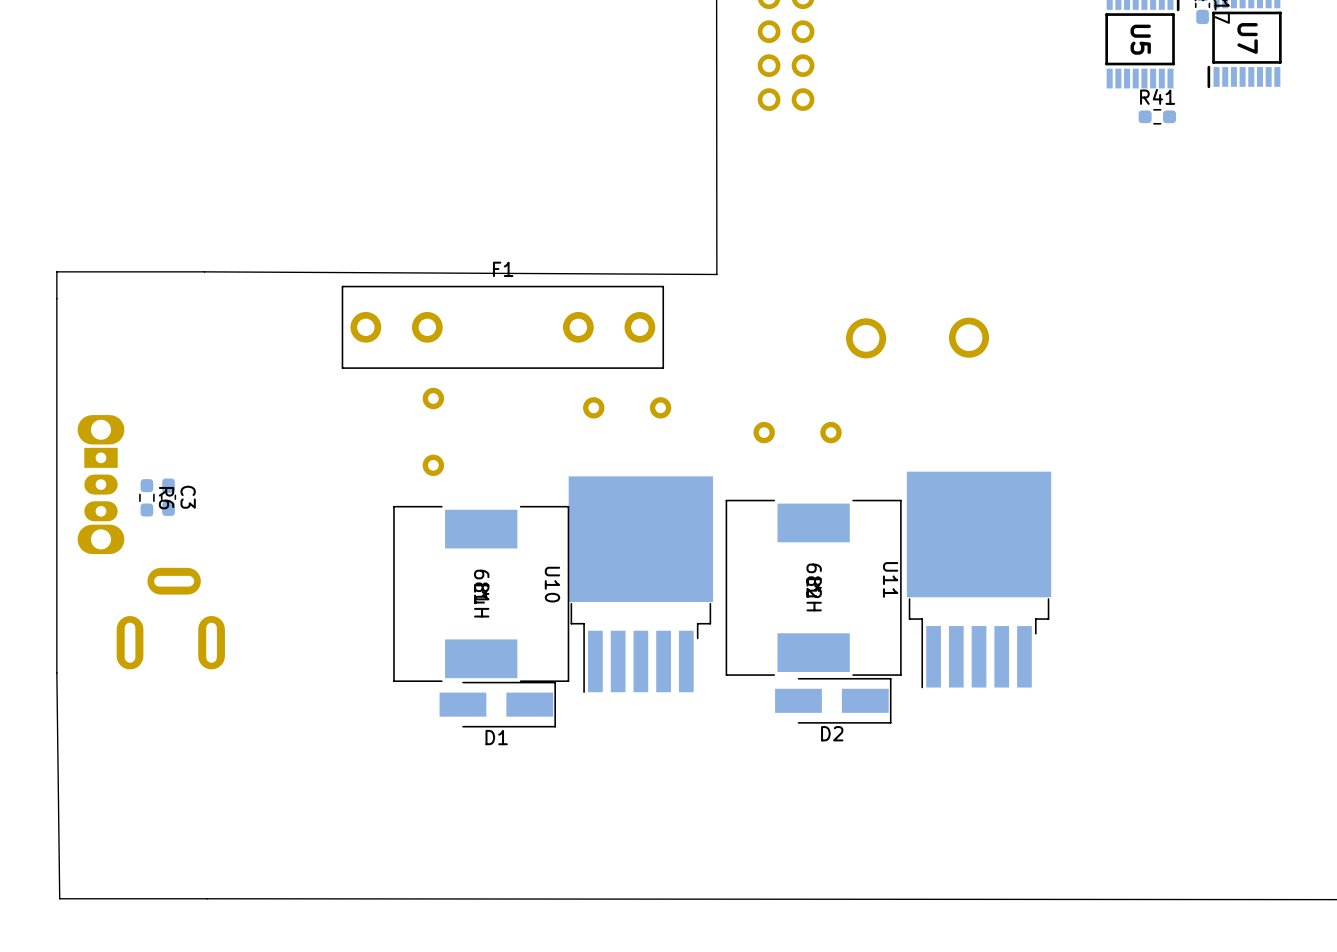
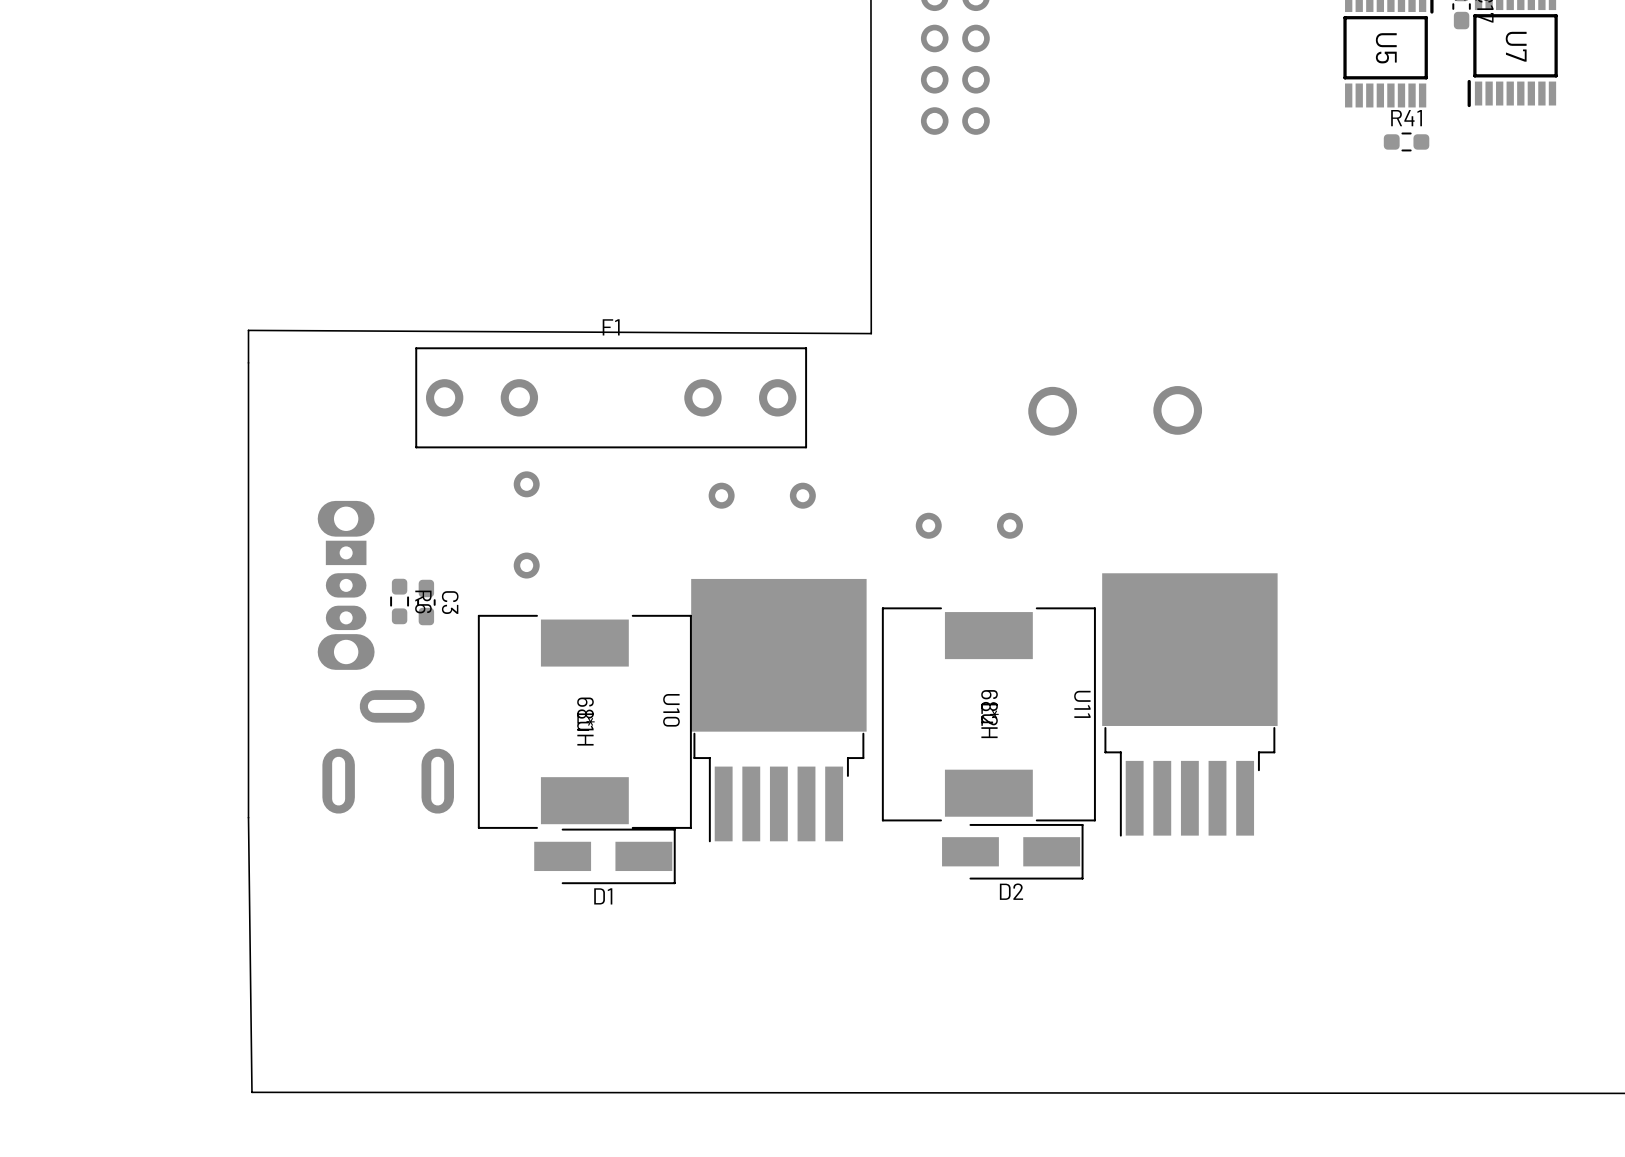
board edge: (204, 271) (56, 271) (56, 672) (59, 898) (207, 898) -> (248, 330) (248, 817) (251, 1092)
part position: (100, 484) -> (346, 585)
R6 position: (146, 497) -> (399, 601)
C3 position: (168, 497) -> (426, 602)
part position: (170, 618) -> (388, 751)

